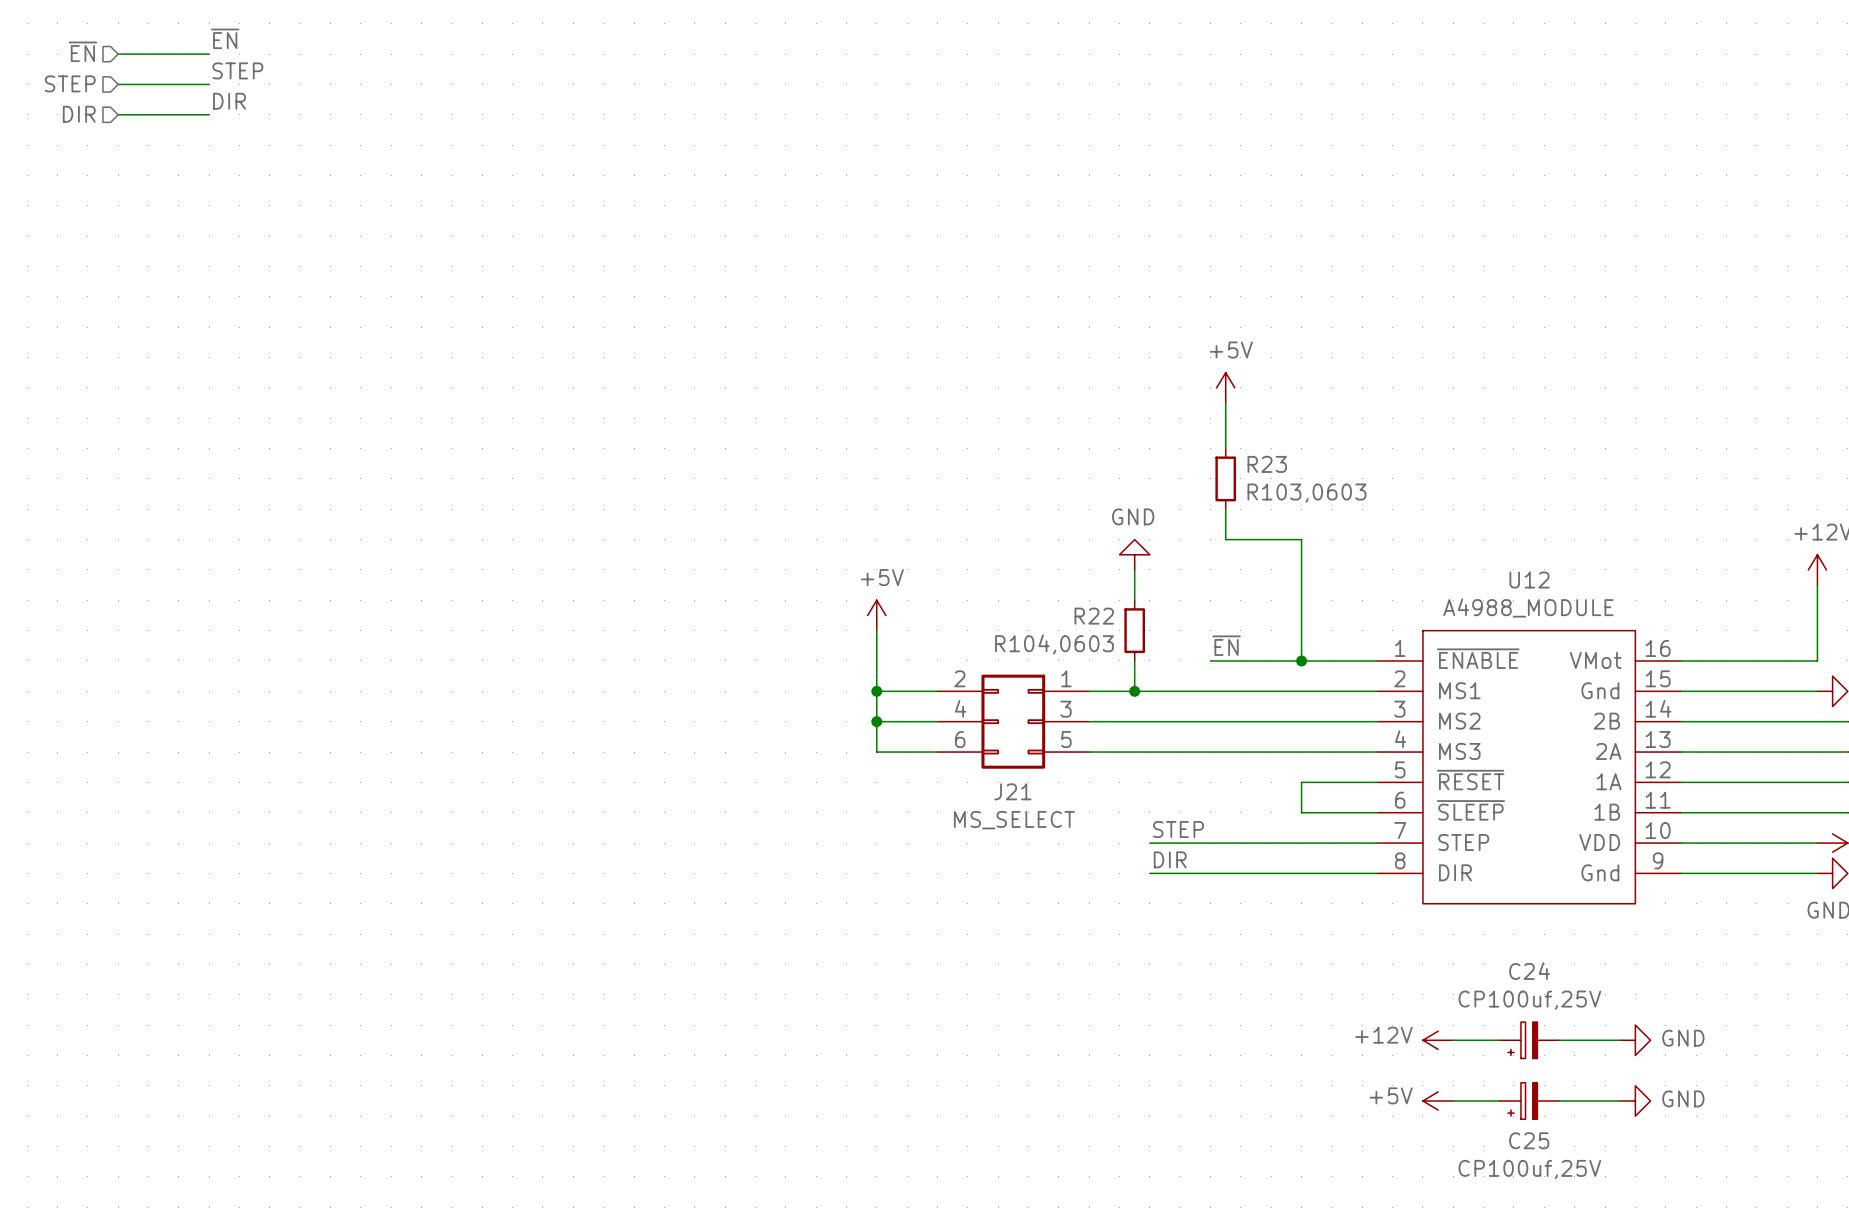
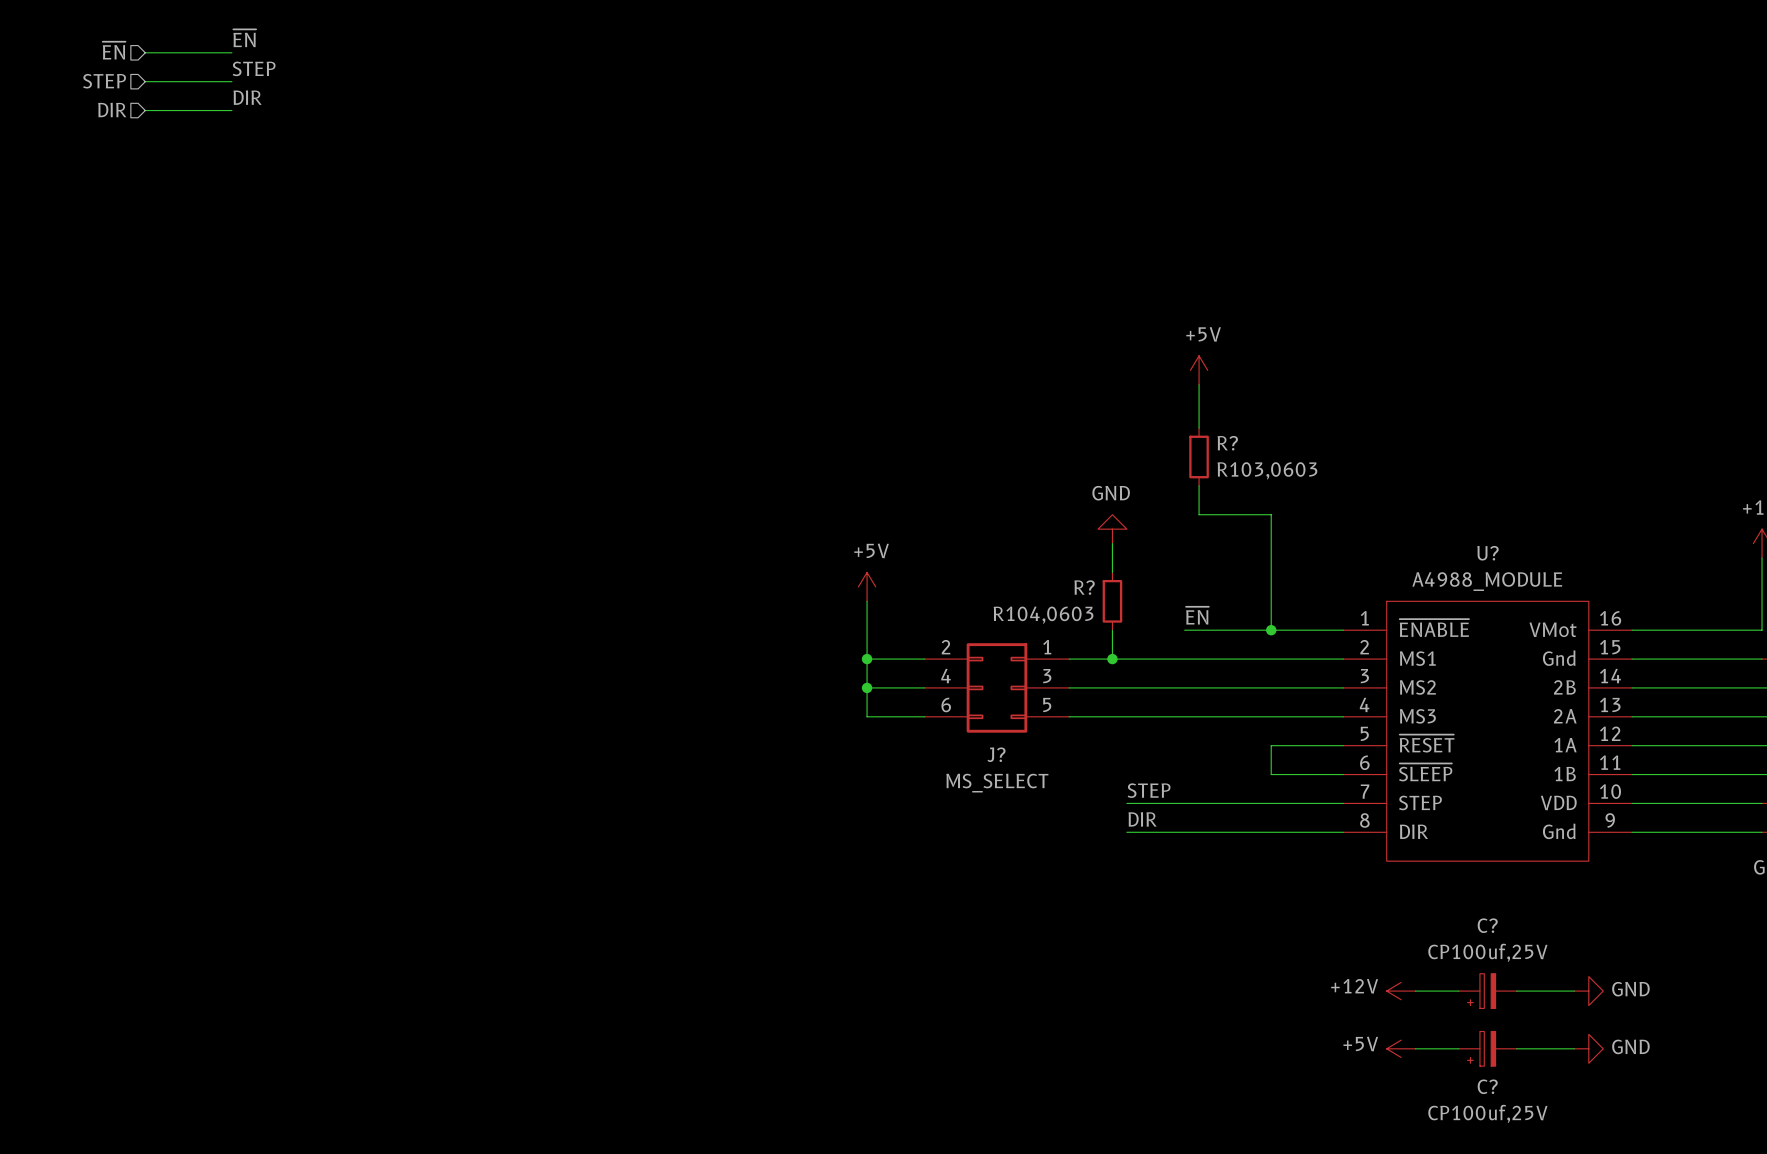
R23 name: R23 (1267, 464) -> R? (1227, 443)
U12 name: U12 (1529, 580) -> U? (1487, 553)
R22 name: R22 (1094, 616) -> R? (1084, 587)
J21 name: J21 (1012, 791) -> J? (996, 754)
C24 name: C24 (1529, 971) -> C? (1487, 925)
C25 name: C25 (1529, 1140) -> C? (1487, 1086)

